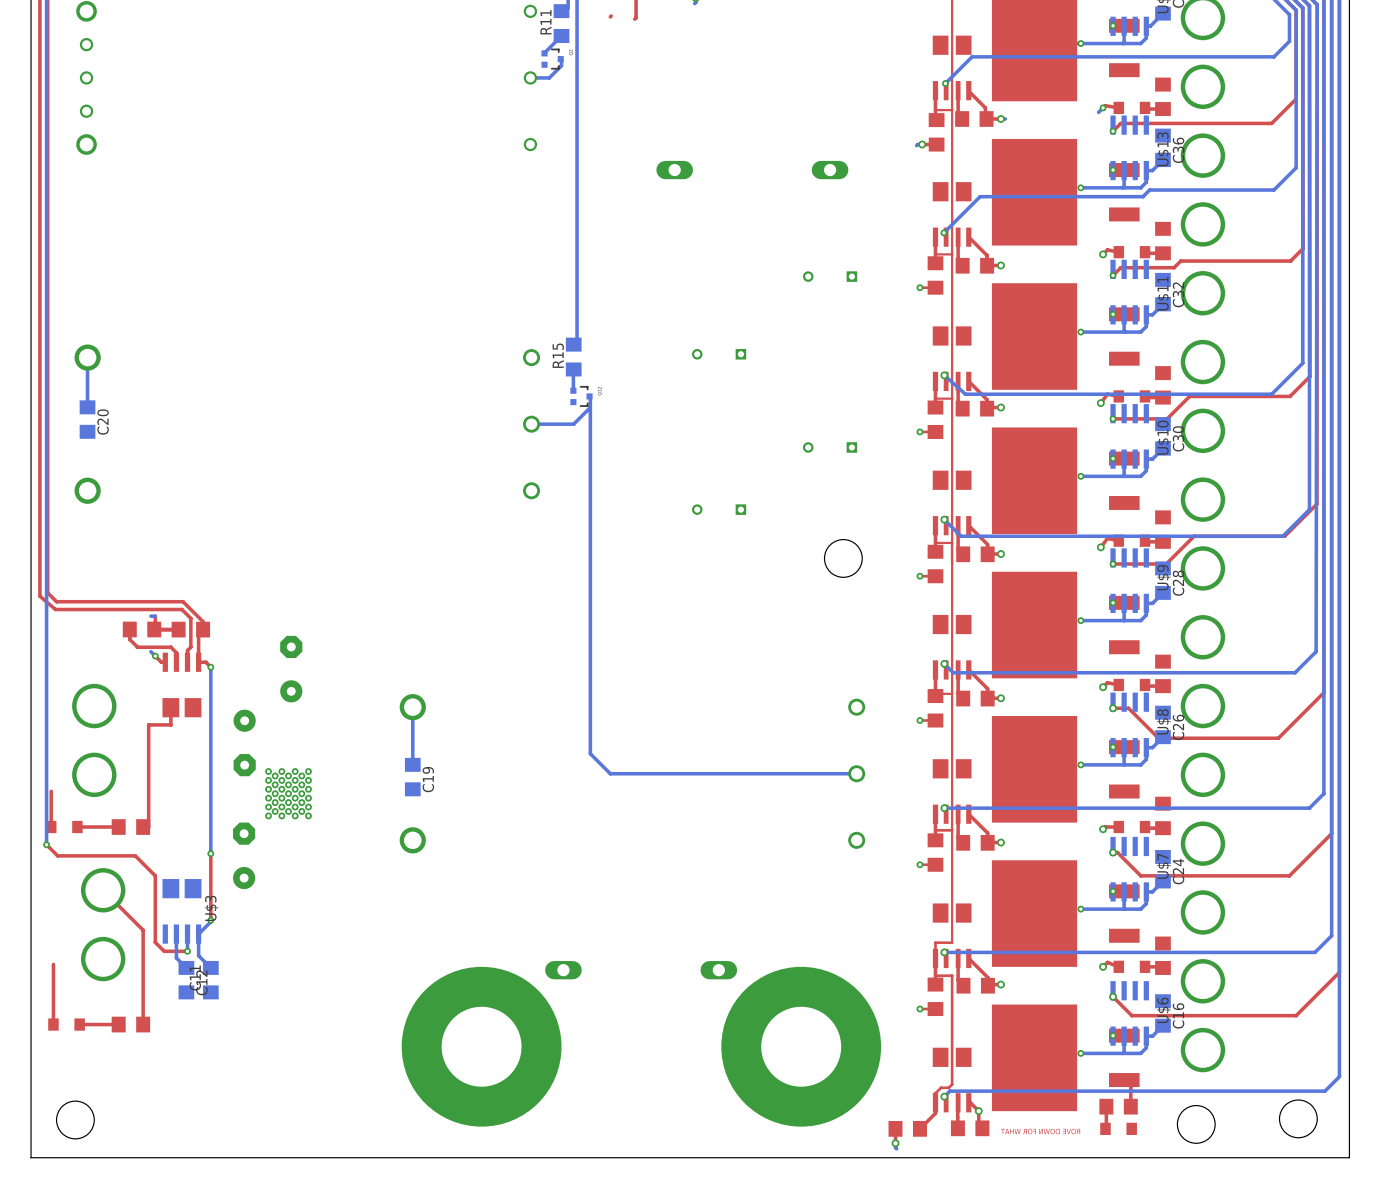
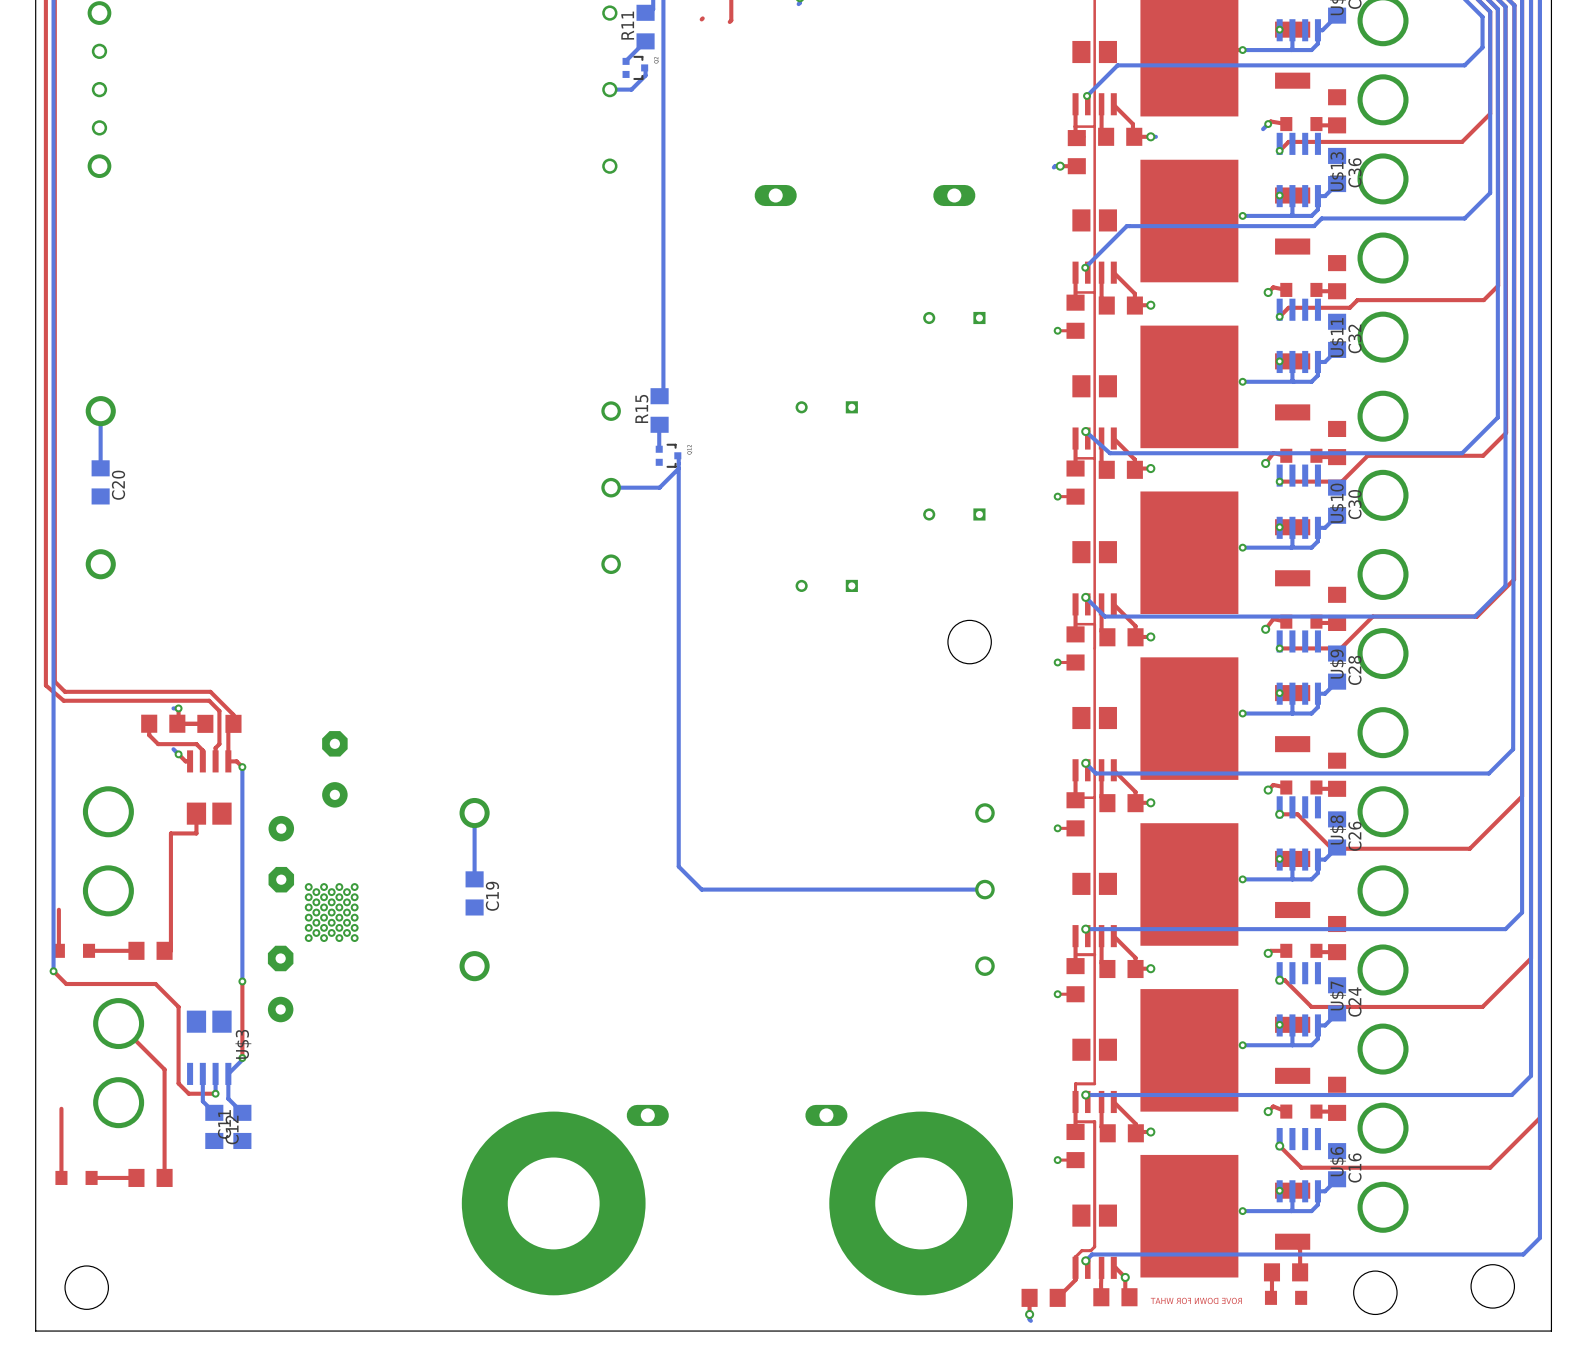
via: none -> (178, 708)

